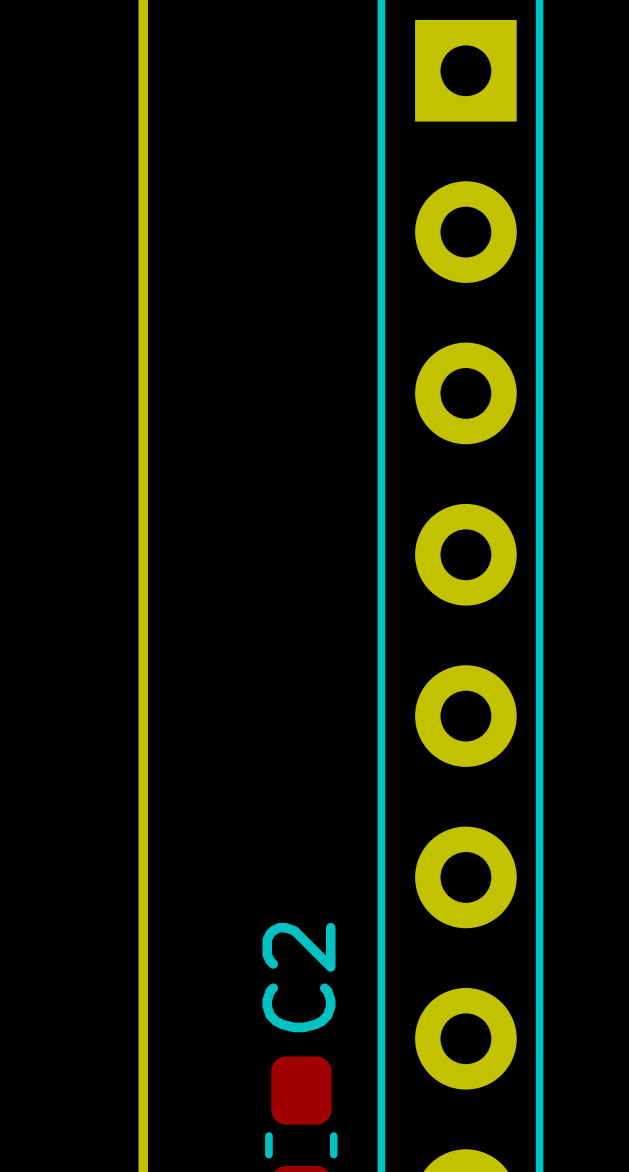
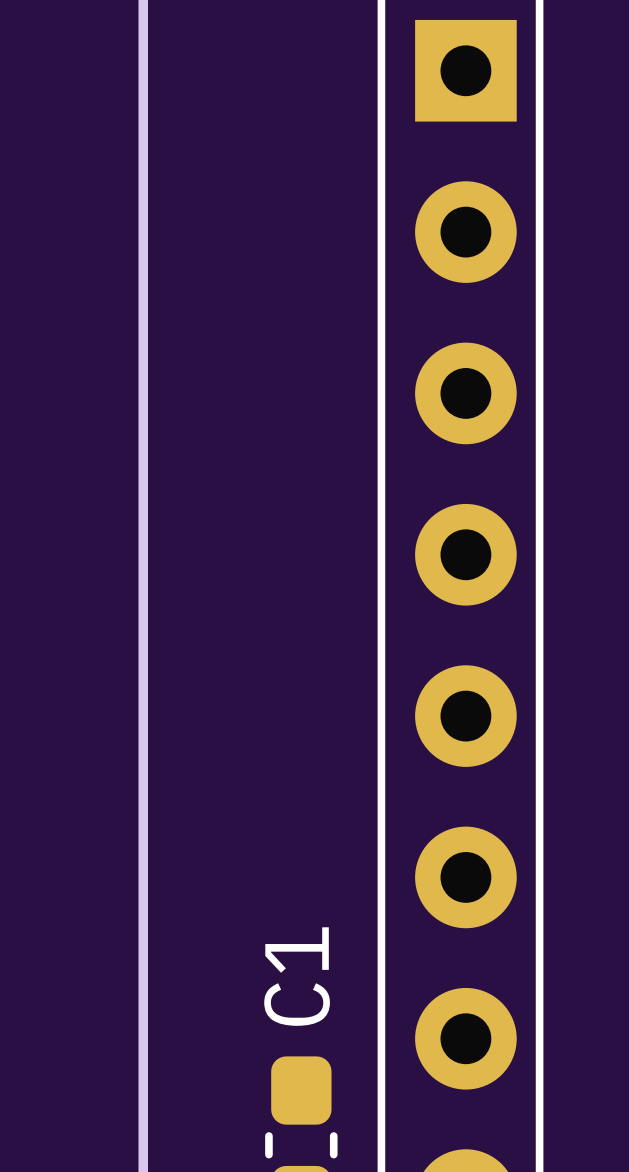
C2 name: C2 (298, 977) -> C1 (297, 976)

